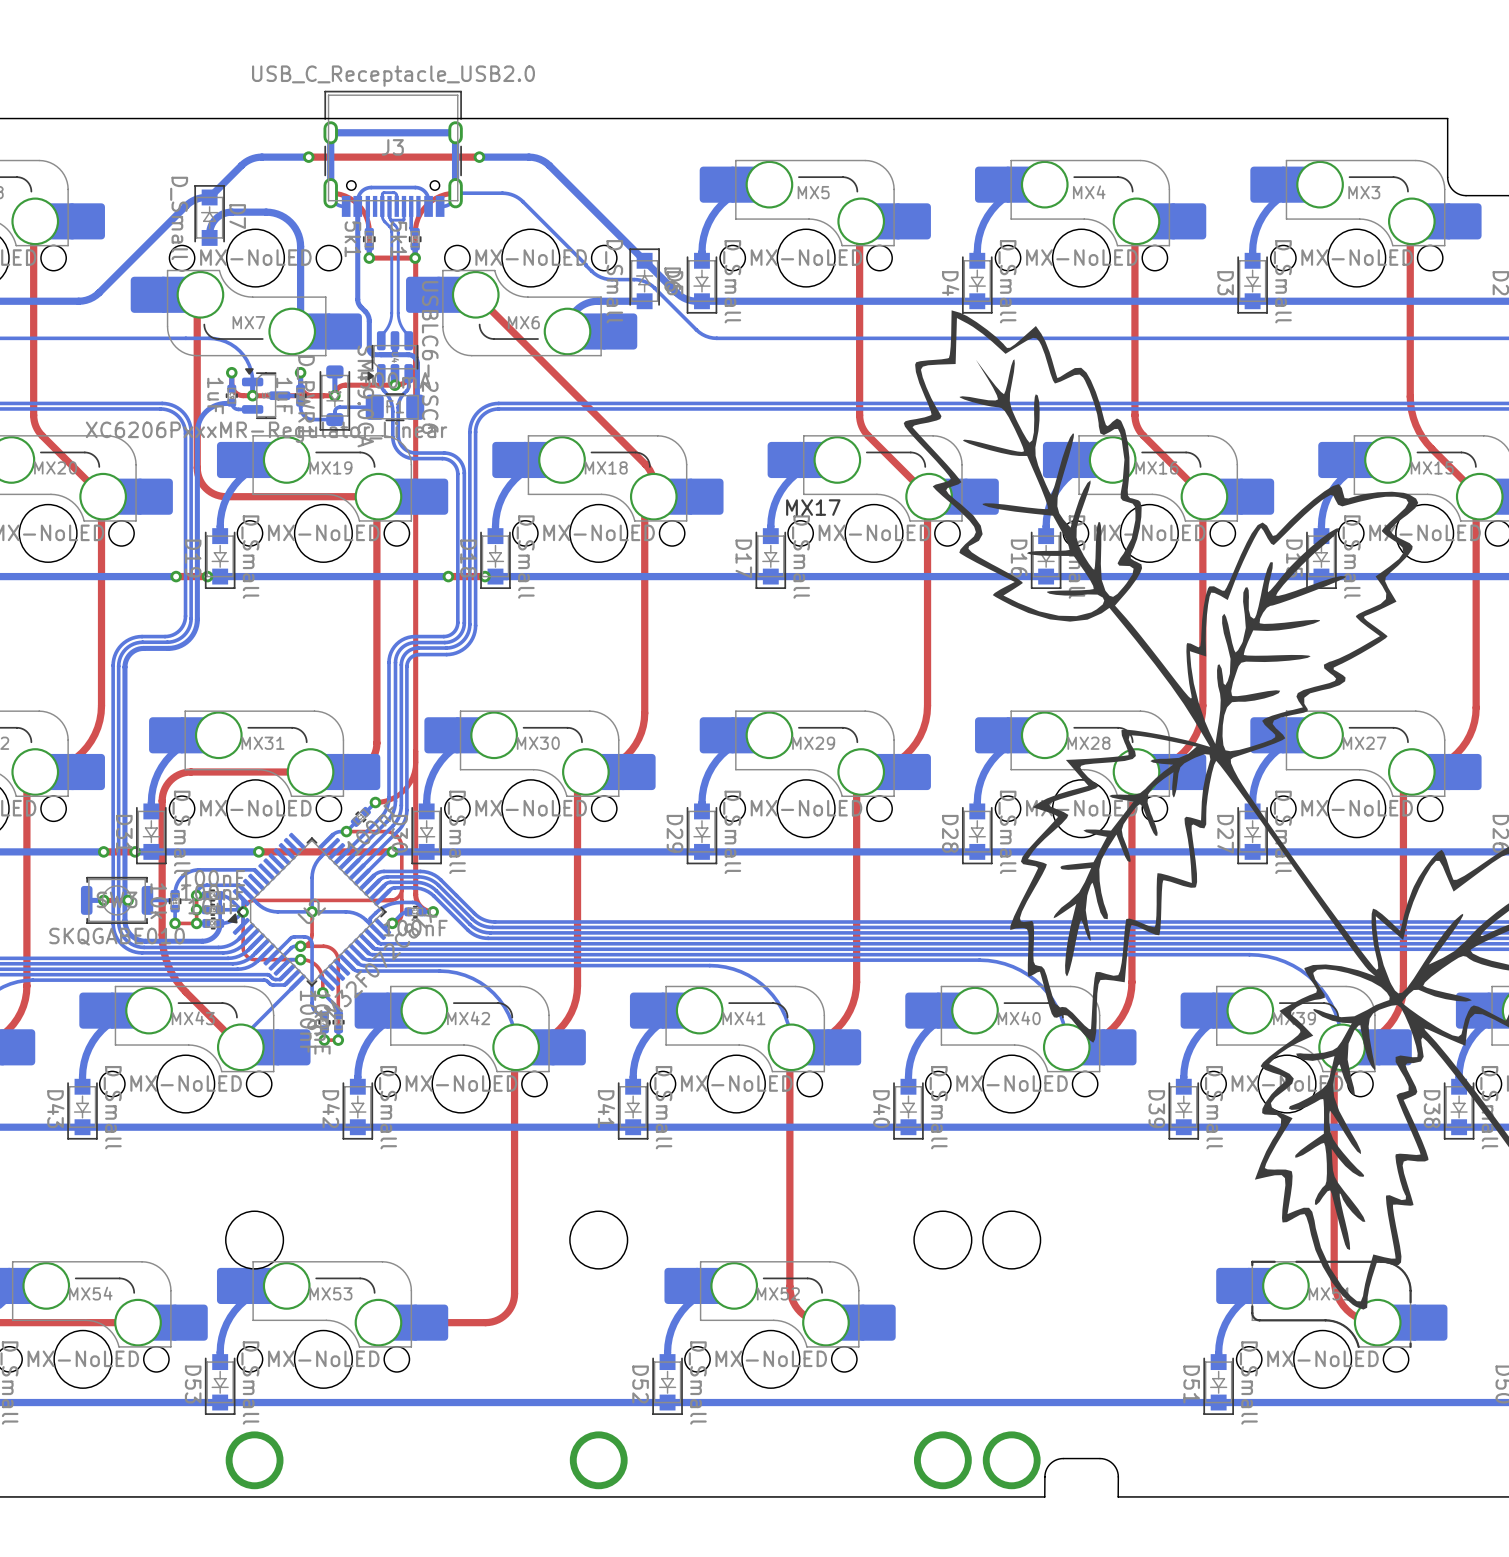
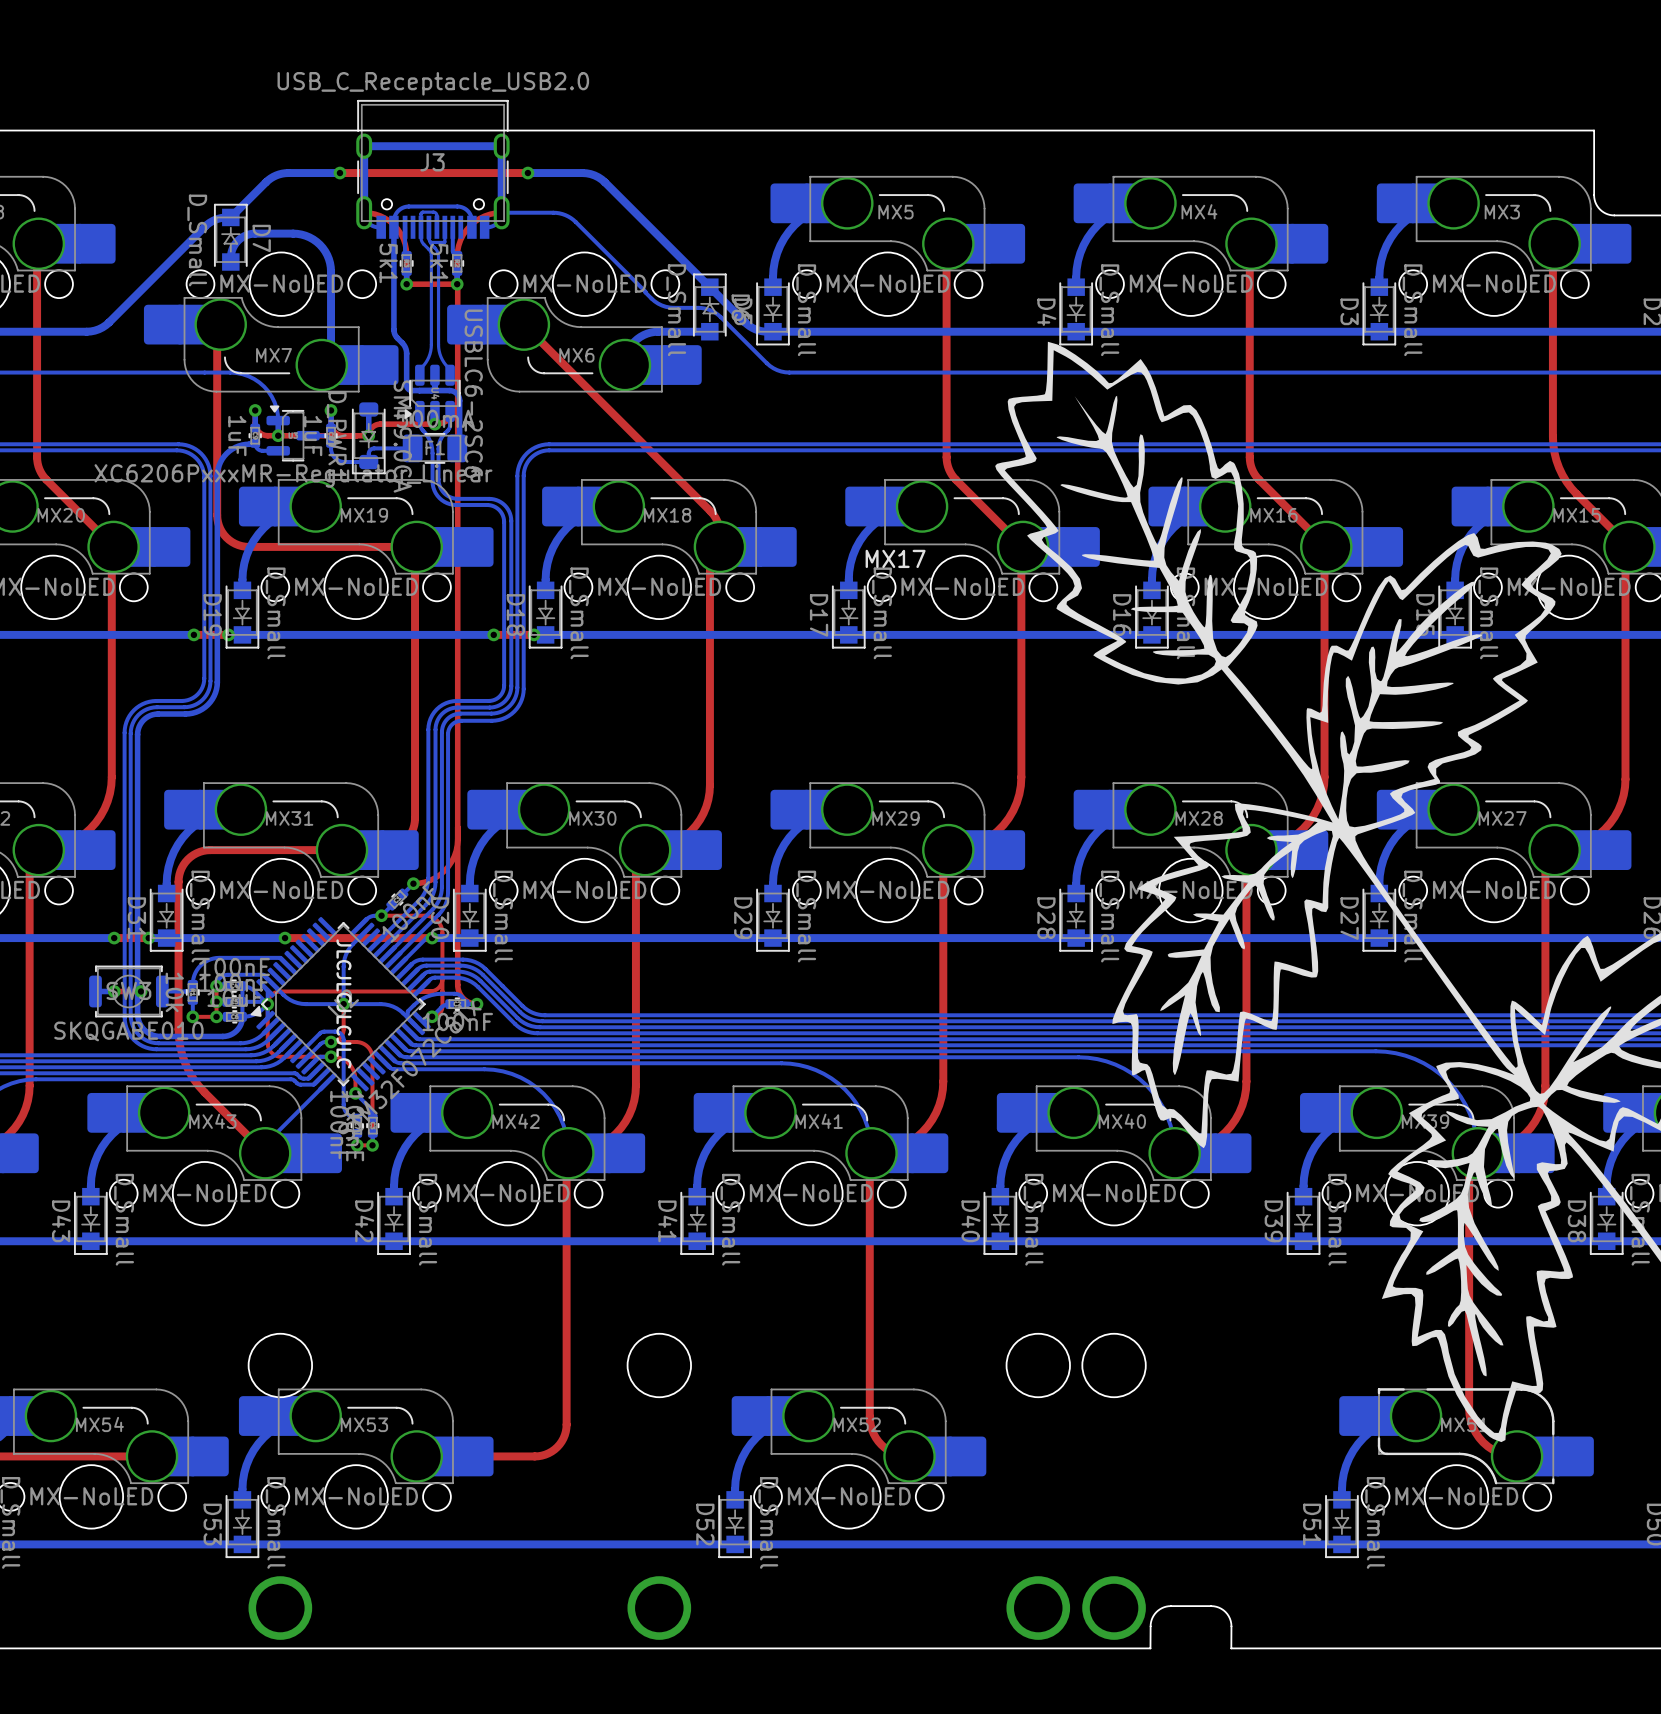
text: none -> JLCJLCJLCJLC (343, 1003)

